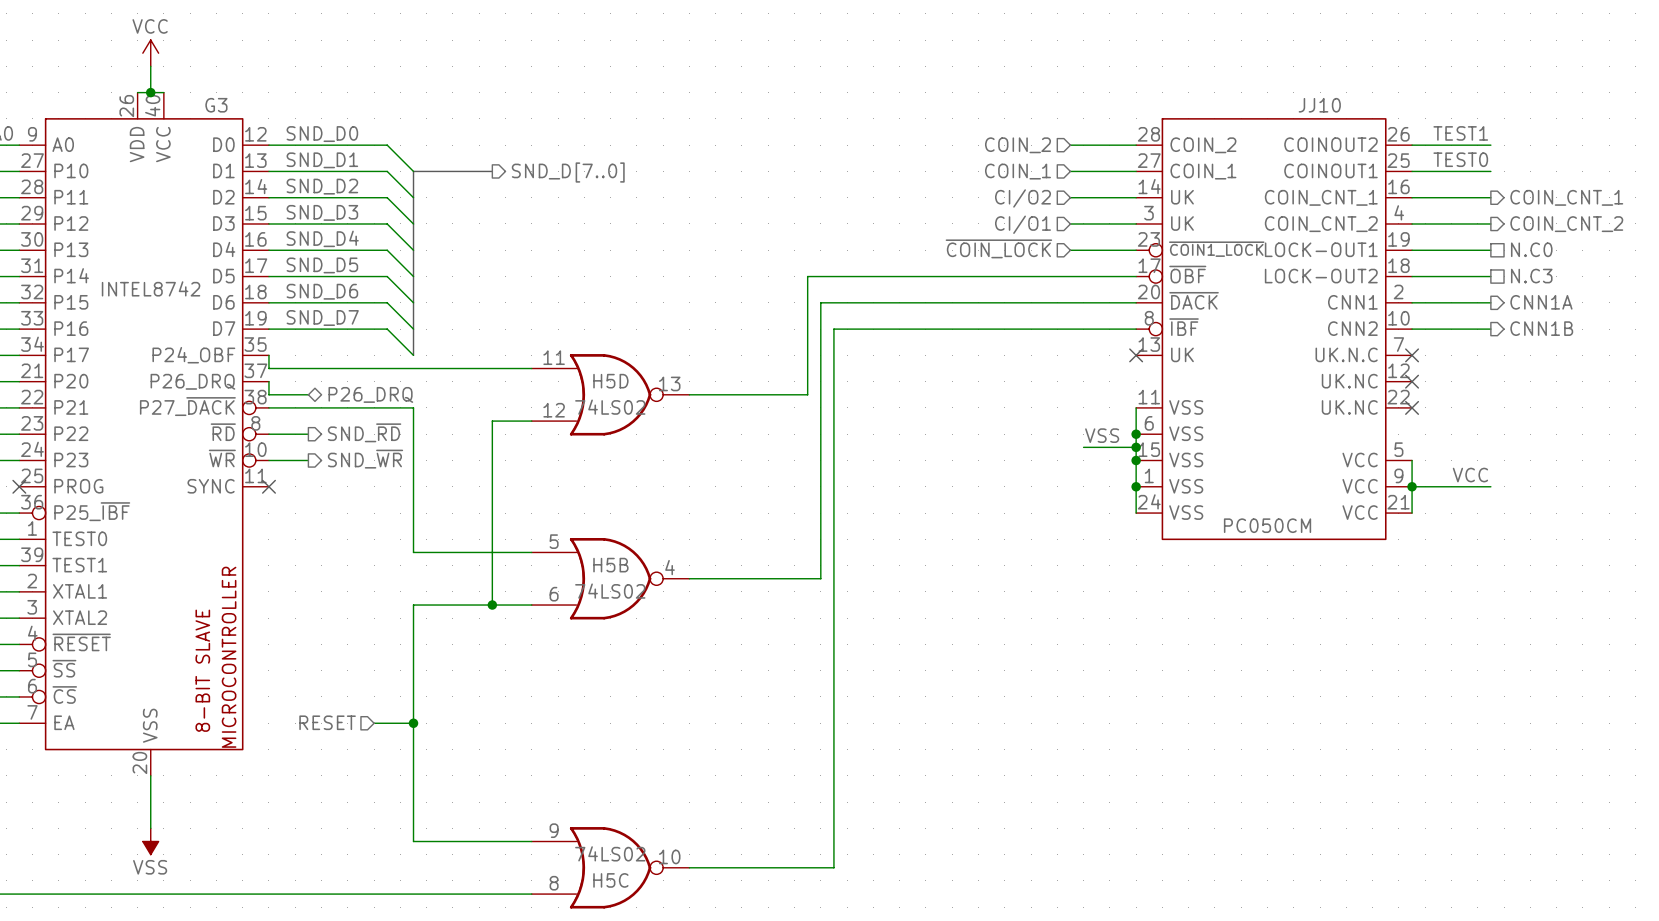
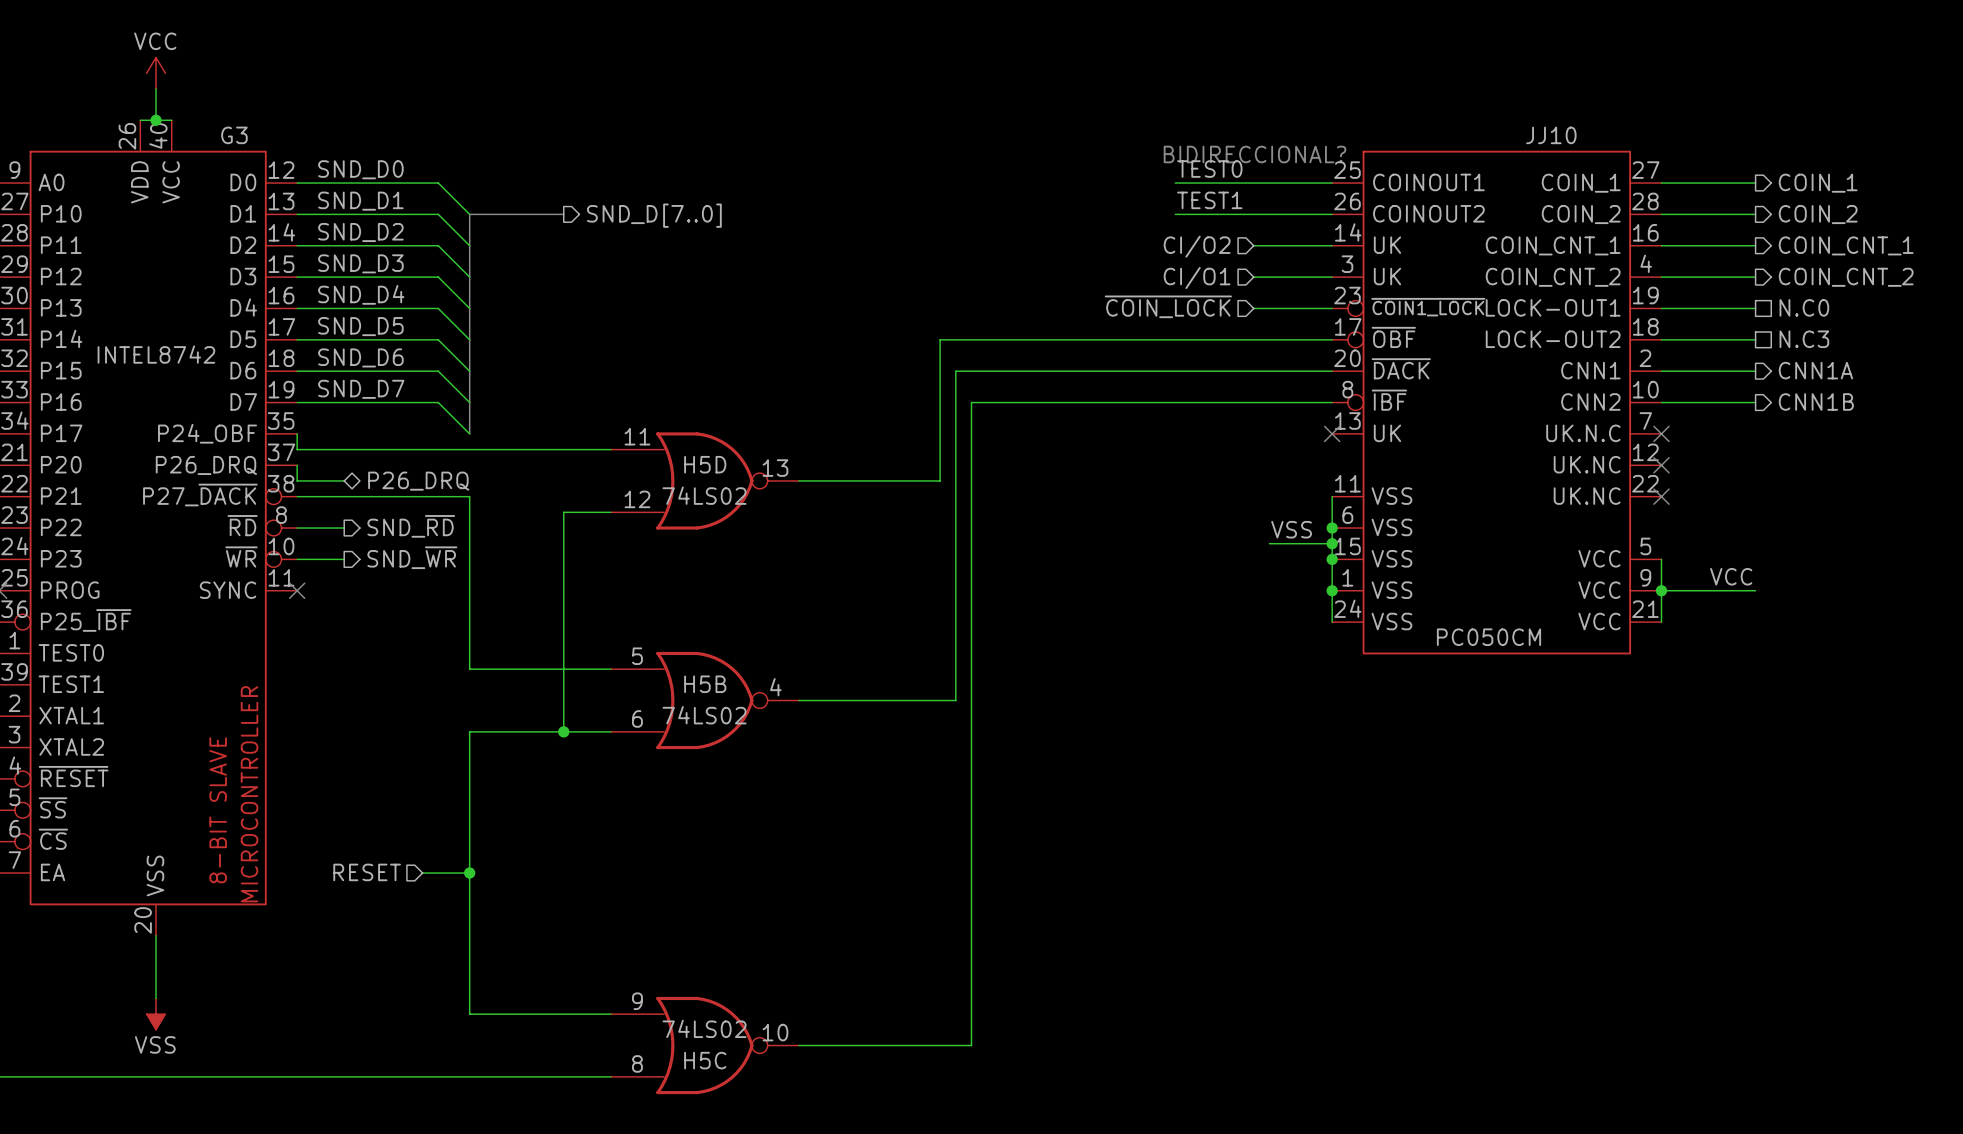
text: none -> BIDIRECCIONAL? (1254, 154)
label: none -> TEST0 (1209, 169)
label: TEST1 (1460, 133) -> none
JJ10 pin number: 28 (1148, 134) -> 25 (1347, 170)
JJ10 pin number: 26 (1398, 134) -> 27 (1645, 170)
JJ10 pin name: COINOUT2 (1330, 144) -> COIN_1 (1581, 183)
wire: none -> (1175, 183) (1253, 183)
hierarchical label: COIN_2 (1017, 145) -> none
JJ10 pin name: COIN_2 (1203, 145) -> COINOUT1 (1428, 182)
hierarchical label: none -> COIN_1 (1818, 183)
label: none -> TEST1 (1209, 200)
label: TEST0 (1460, 159) -> none
JJ10 pin number: 27 (1149, 160) -> 26 (1347, 201)
JJ10 pin number: 25 (1398, 160) -> 28 (1645, 201)
JJ10 pin name: COINOUT1 (1330, 170) -> COIN_2 (1581, 214)
wire: none -> (1175, 214) (1253, 214)
hierarchical label: COIN_1 (1017, 171) -> none
JJ10 pin name: COIN_1 (1203, 171) -> COINOUT2 (1428, 213)
hierarchical label: none -> COIN_2 (1818, 214)

